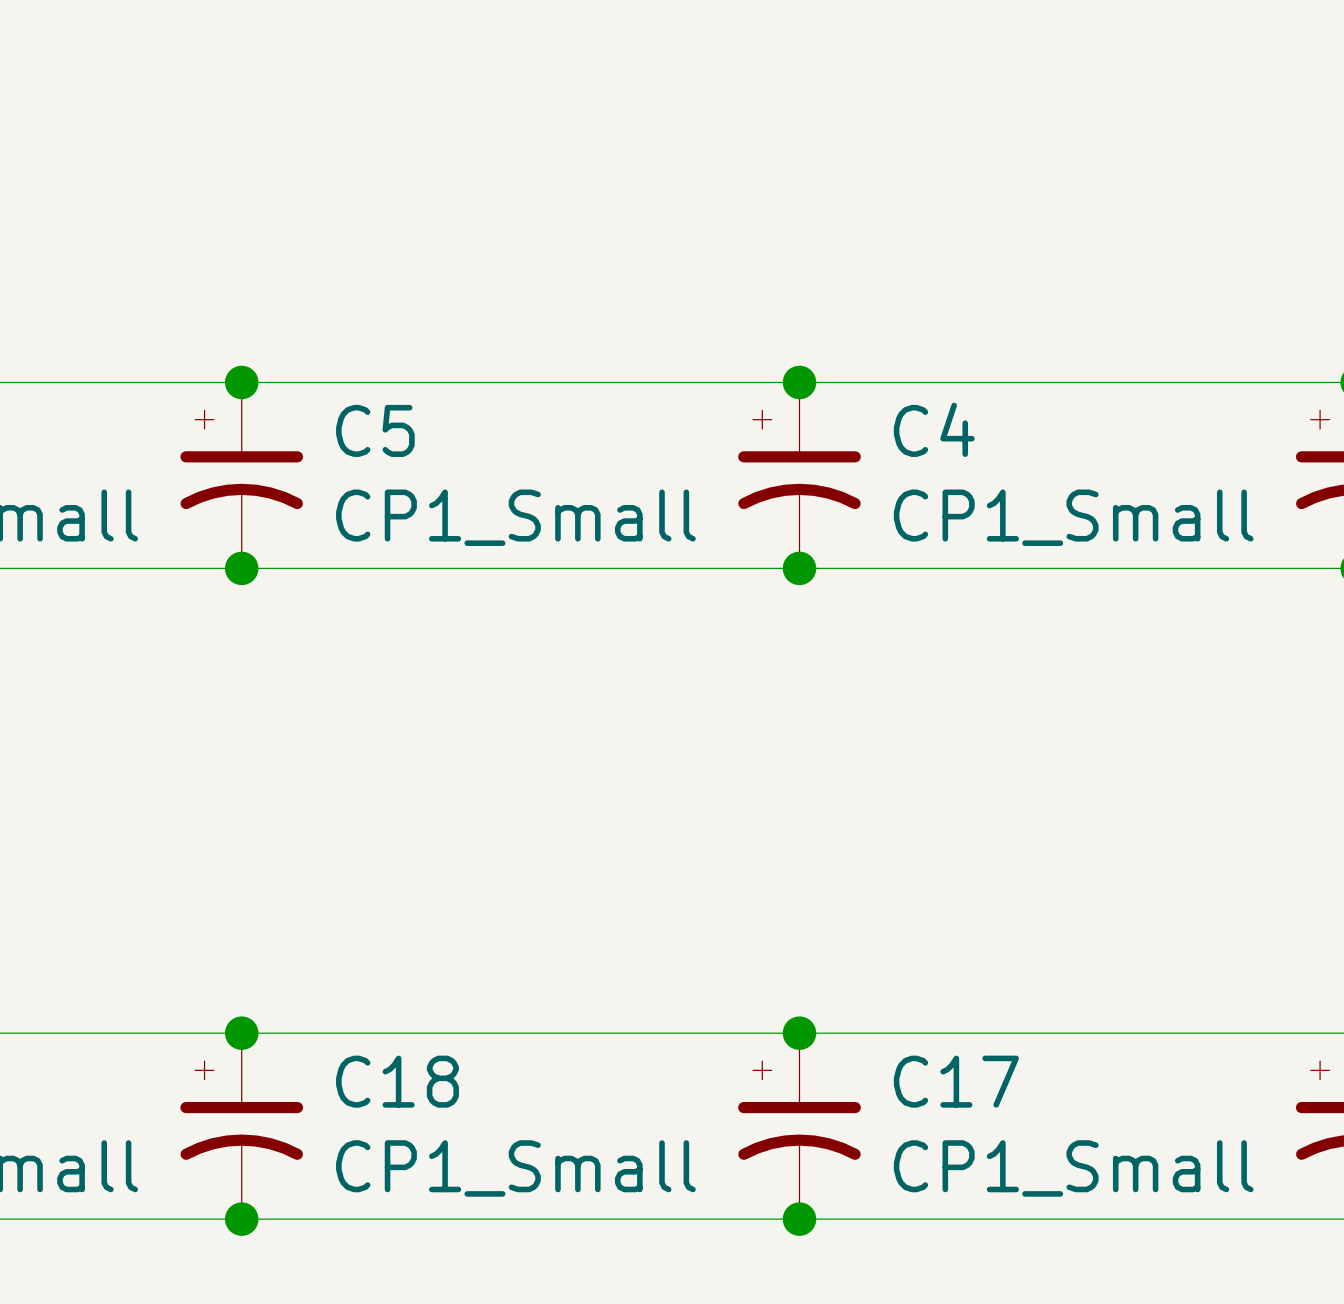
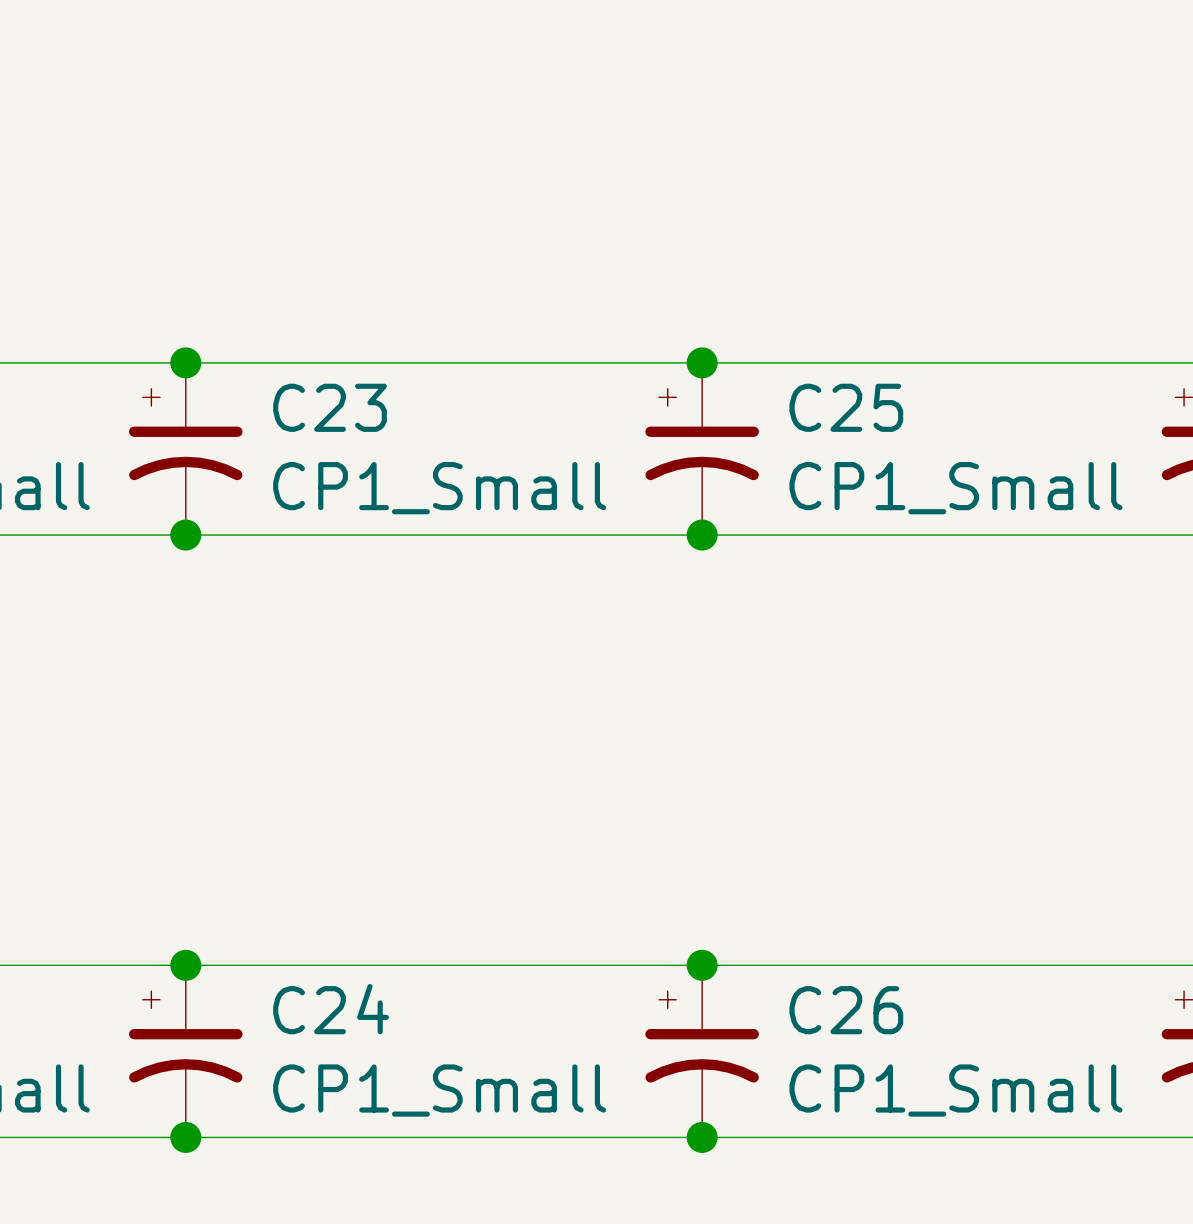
C4 name: C4 (934, 429) -> C25 (846, 407)
C5 name: C5 (375, 430) -> C23 (330, 407)
C18 name: C18 (397, 1081) -> C24 (331, 1009)
C17 name: C17 (956, 1081) -> C26 (846, 1010)

